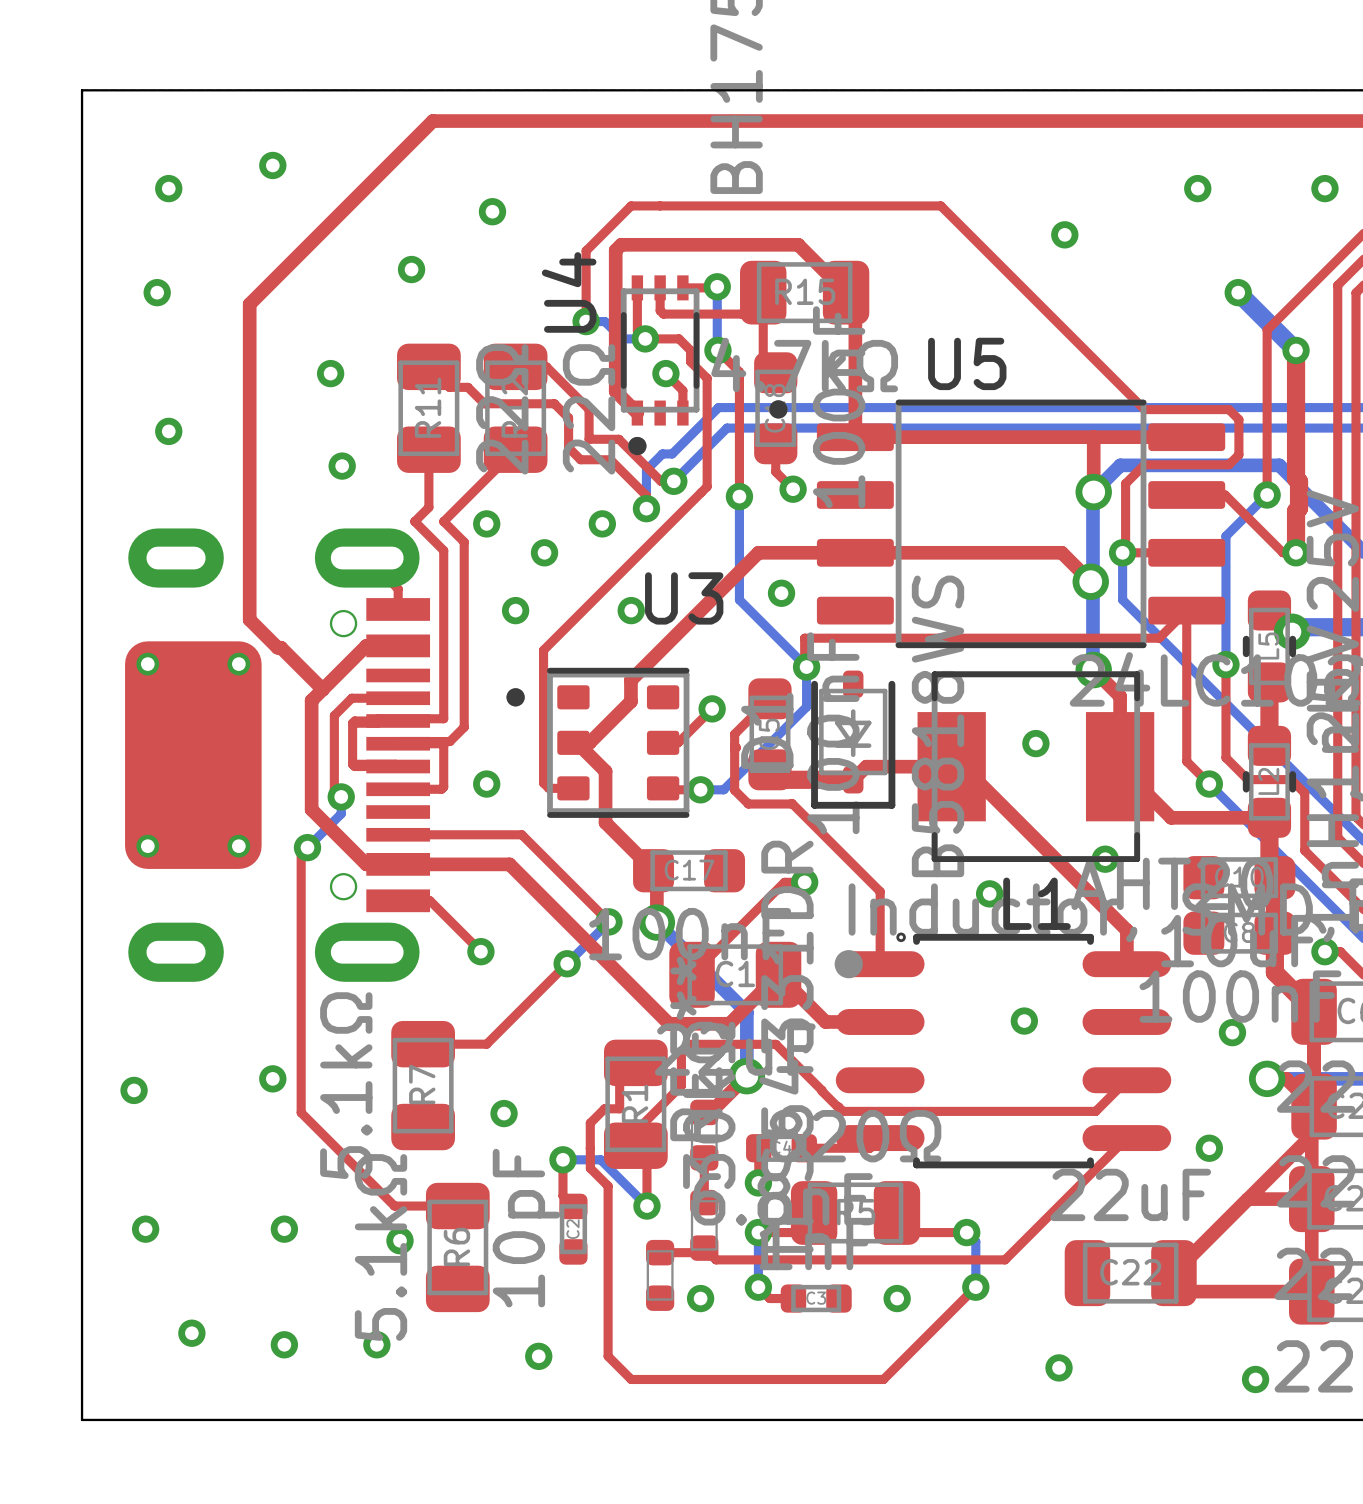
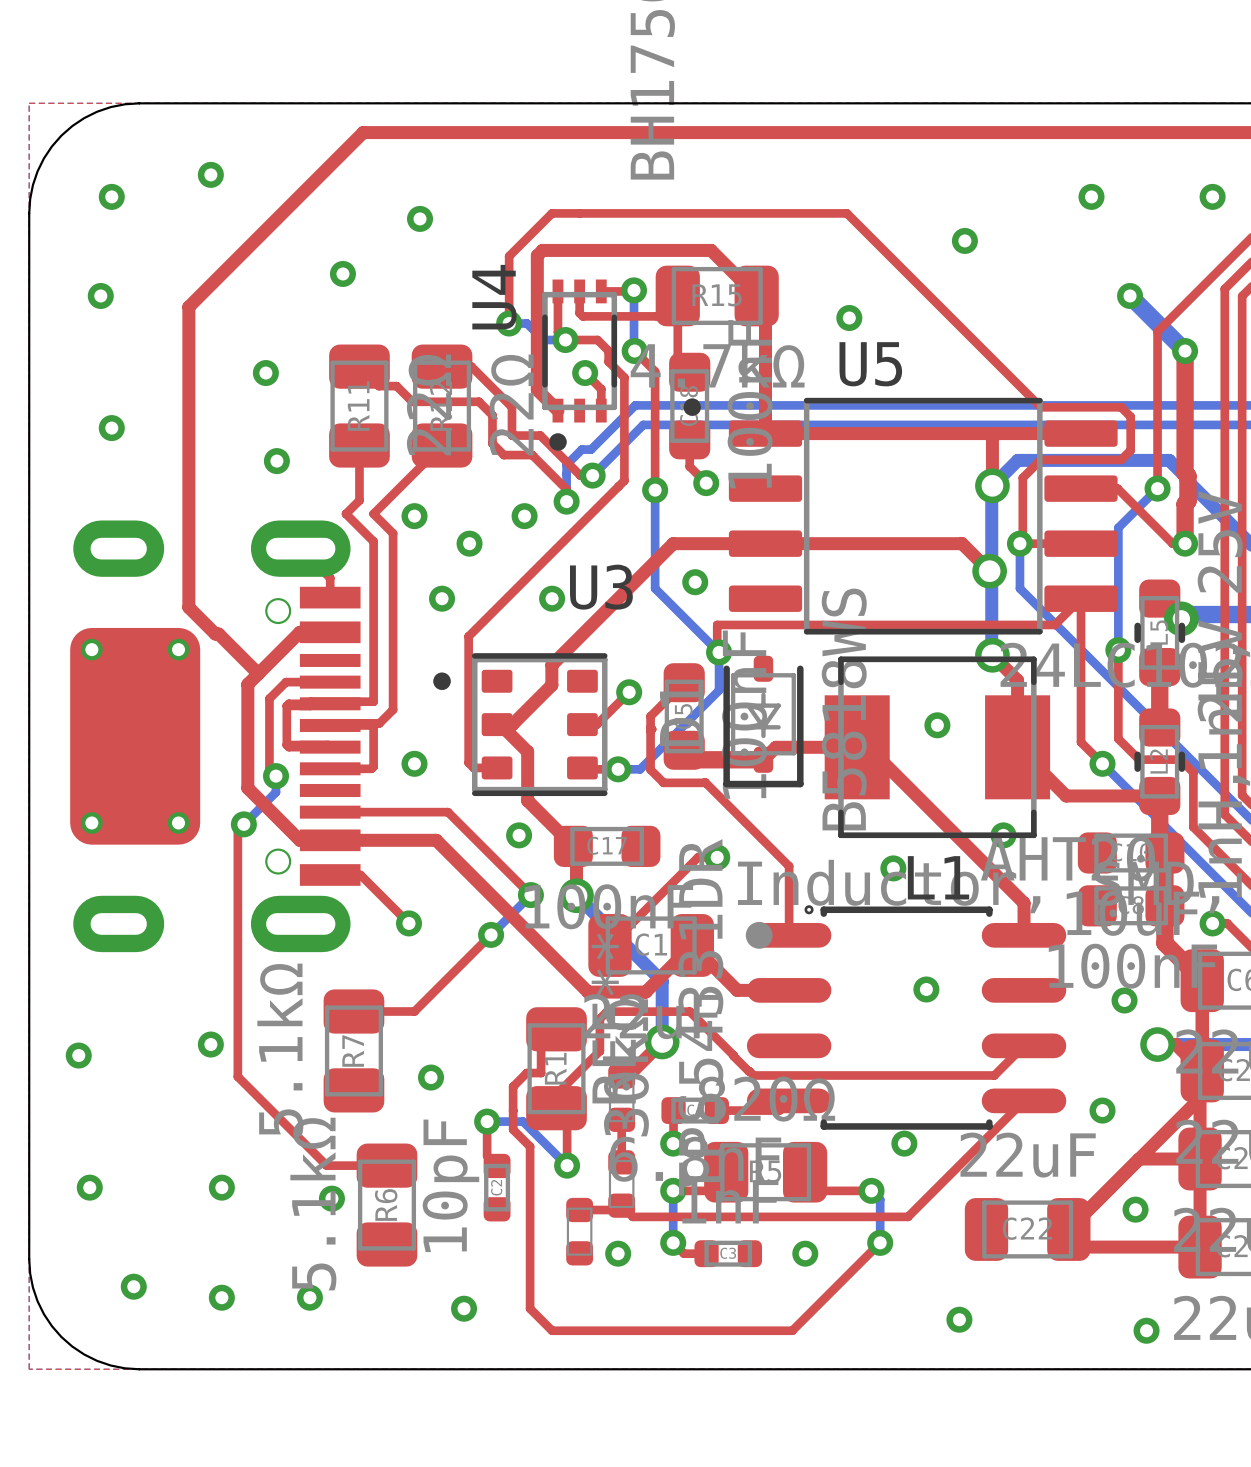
board edge: (197, 90) (82, 90) (82, 205) -> (139, 103) (110, 107) (97, 111) (72, 126) (61, 135) (43, 158) (37, 171) (32, 184) (29, 213)
via: none -> (849, 317)
via: none -> (519, 835)
via: none -> (904, 1143)
via: none -> (1135, 1209)
board edge: (82, 1304) (82, 1419) (197, 1419) -> (29, 1259) (32, 1287) (37, 1301) (43, 1314) (61, 1337) (84, 1354) (97, 1360) (124, 1368) (139, 1369)

